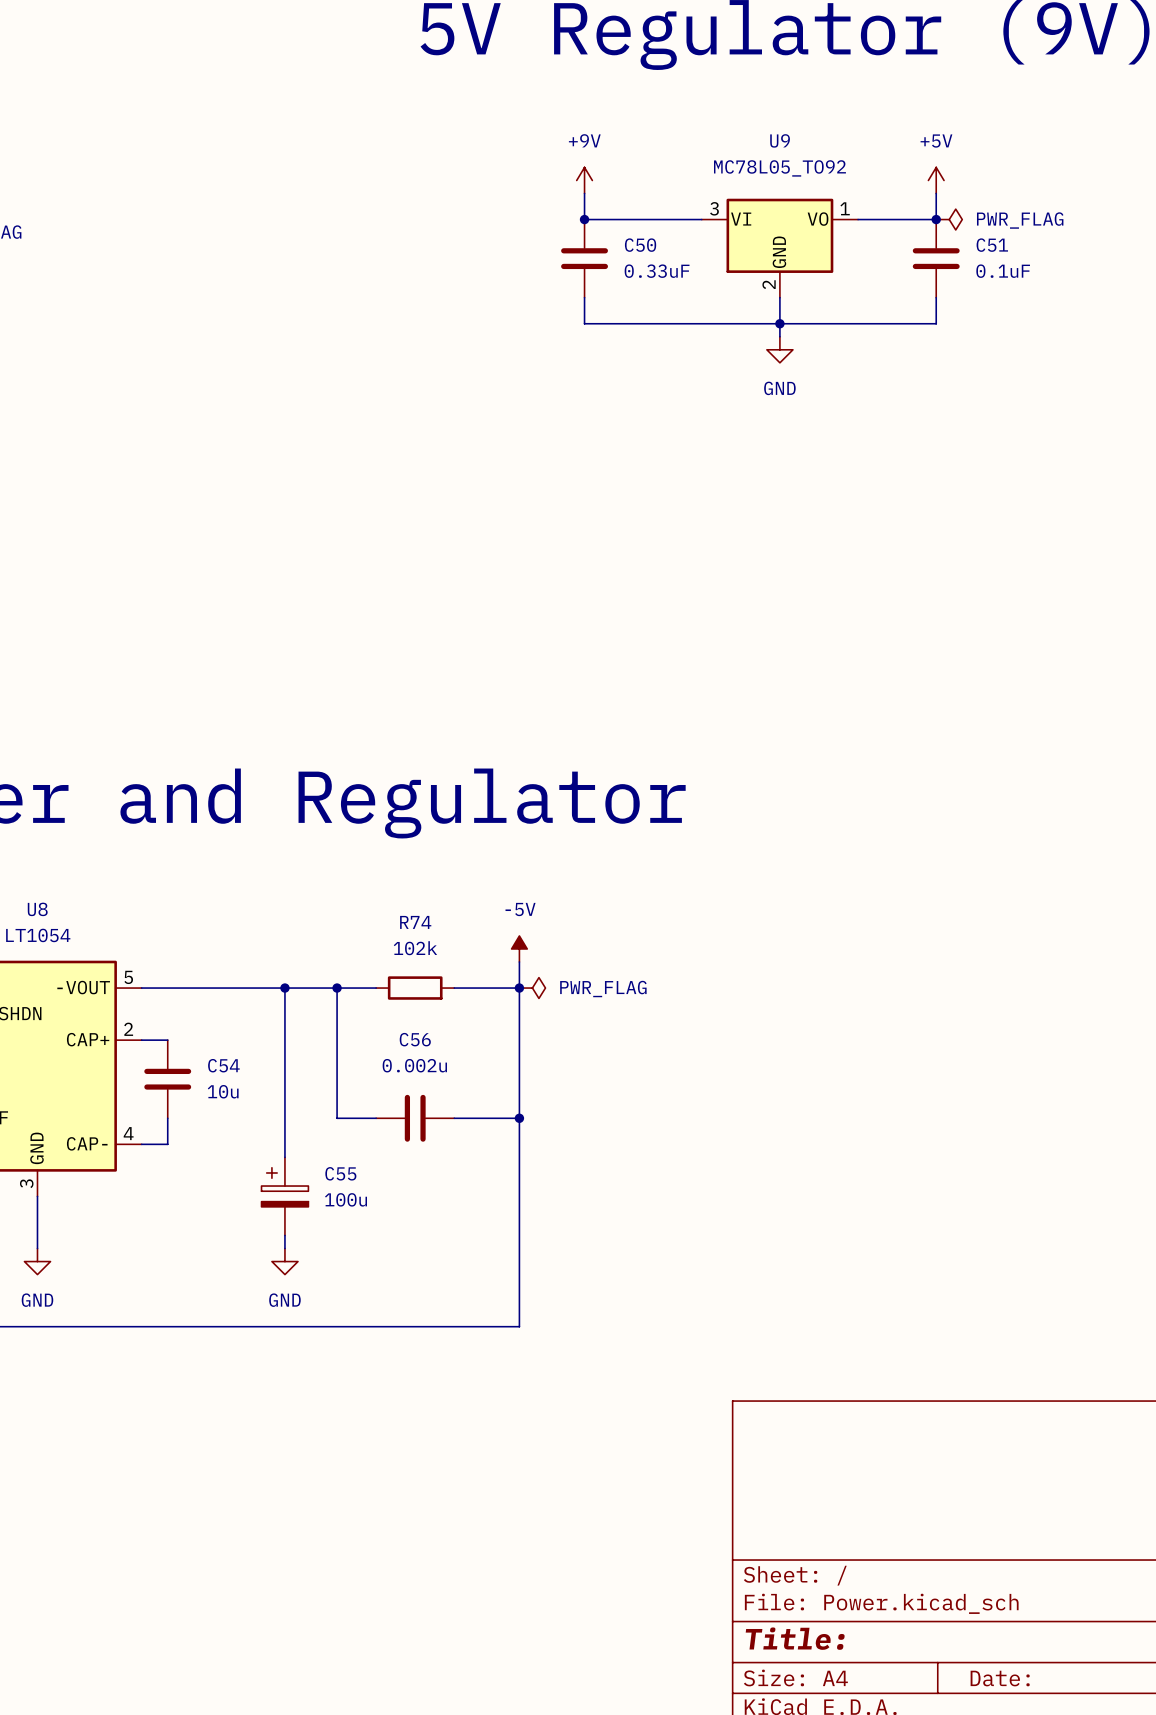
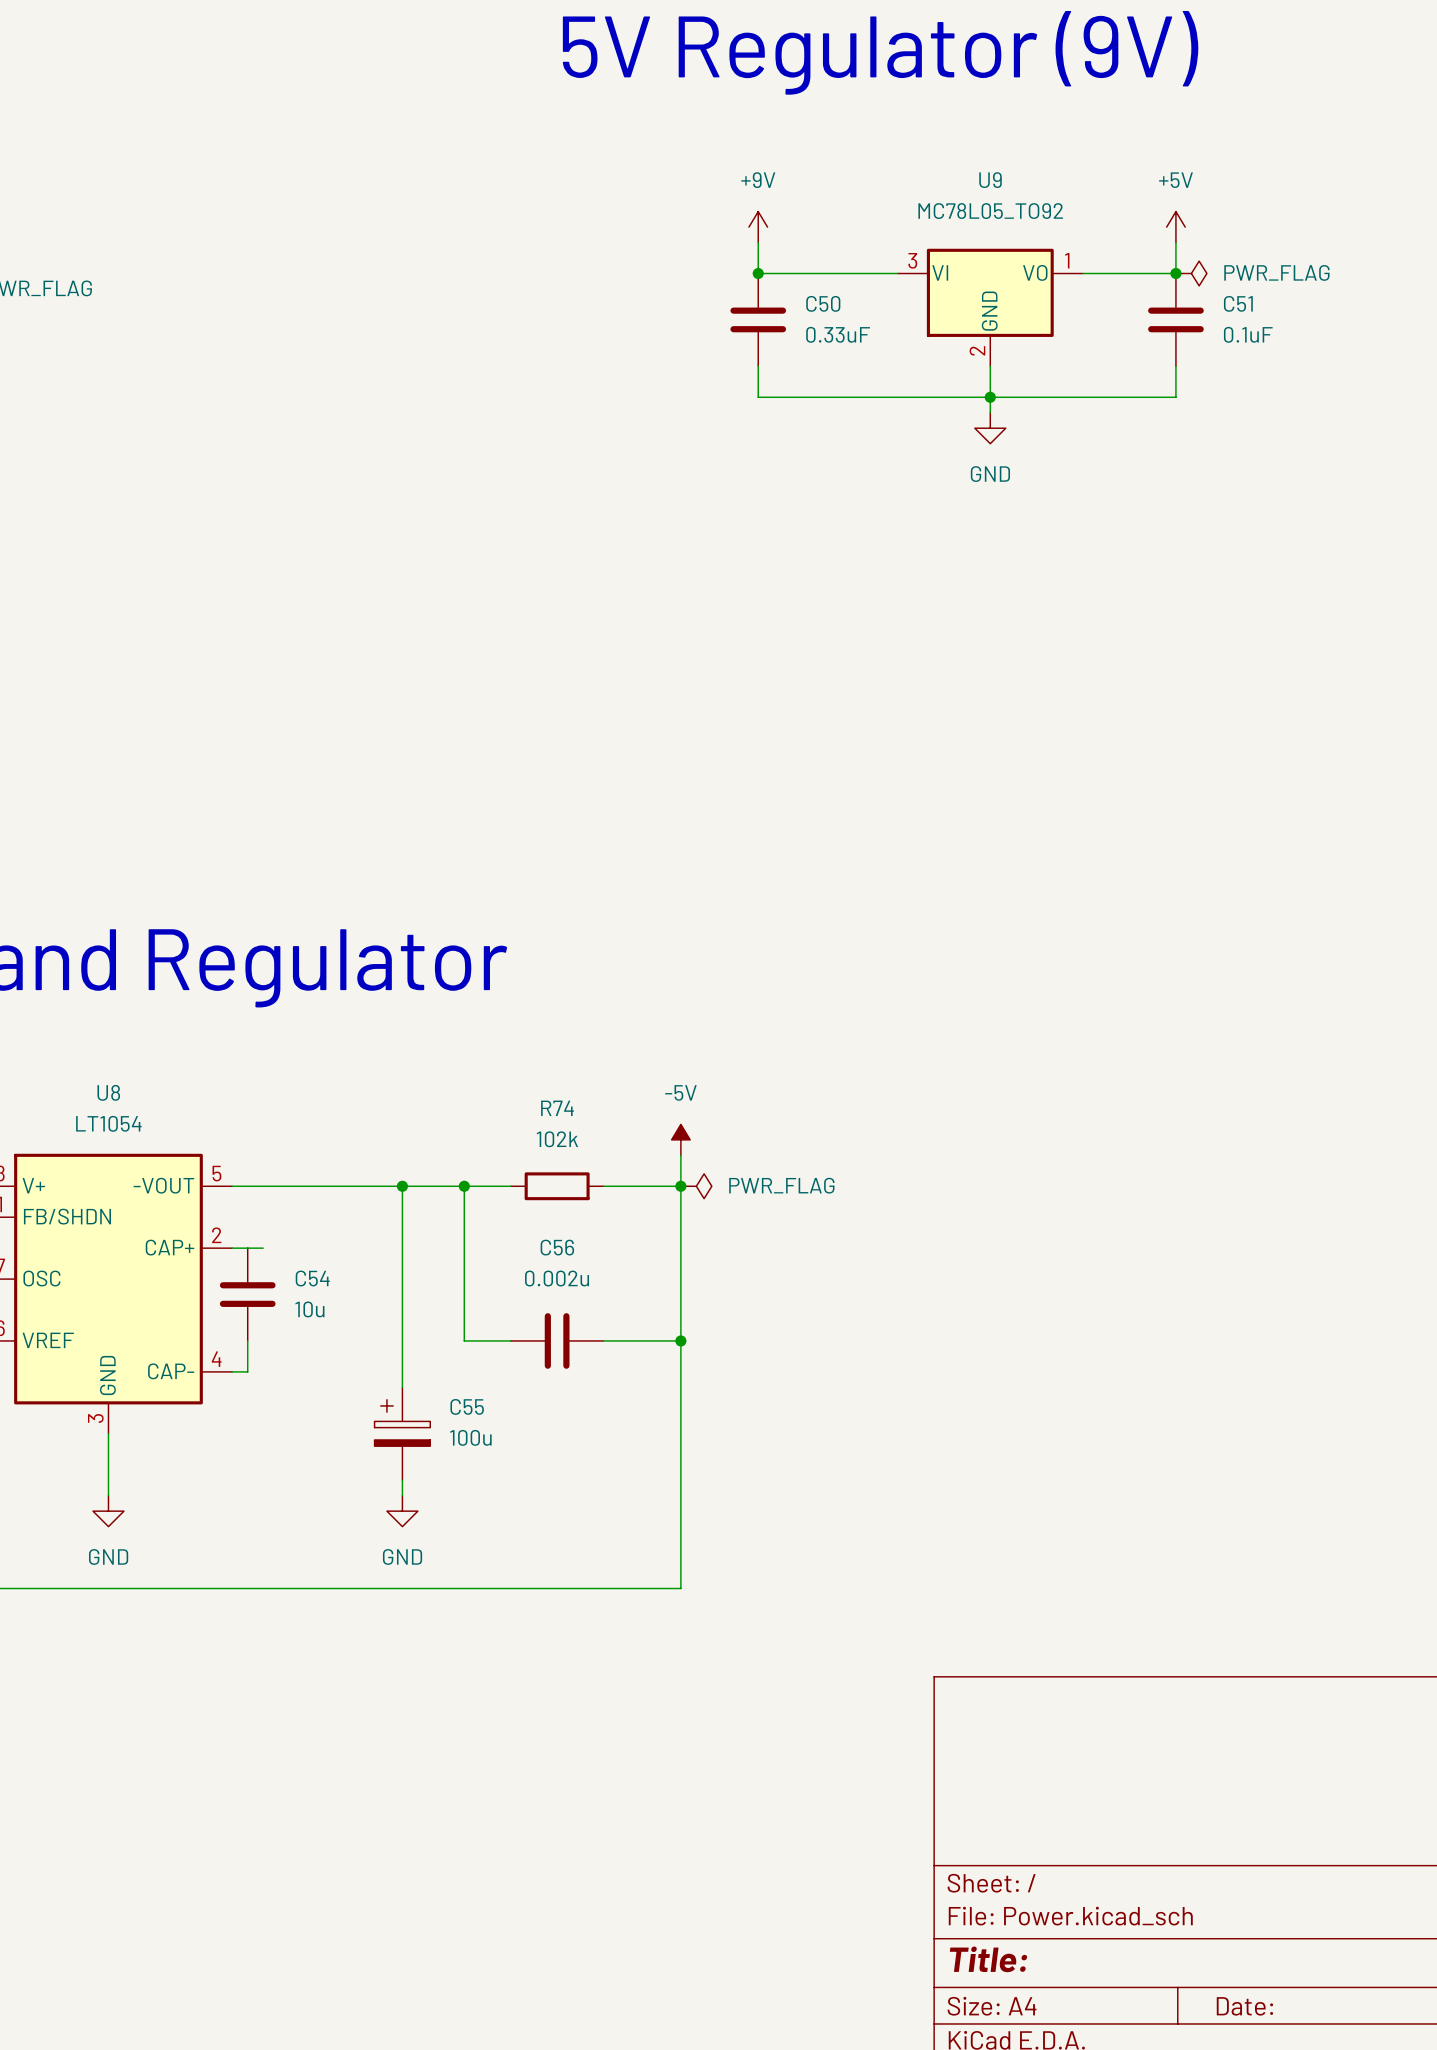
C54 position: (167, 1079) -> (247, 1294)
wire: (167, 1118) (167, 1144) (154, 1144) -> (247, 1340) (247, 1371)

